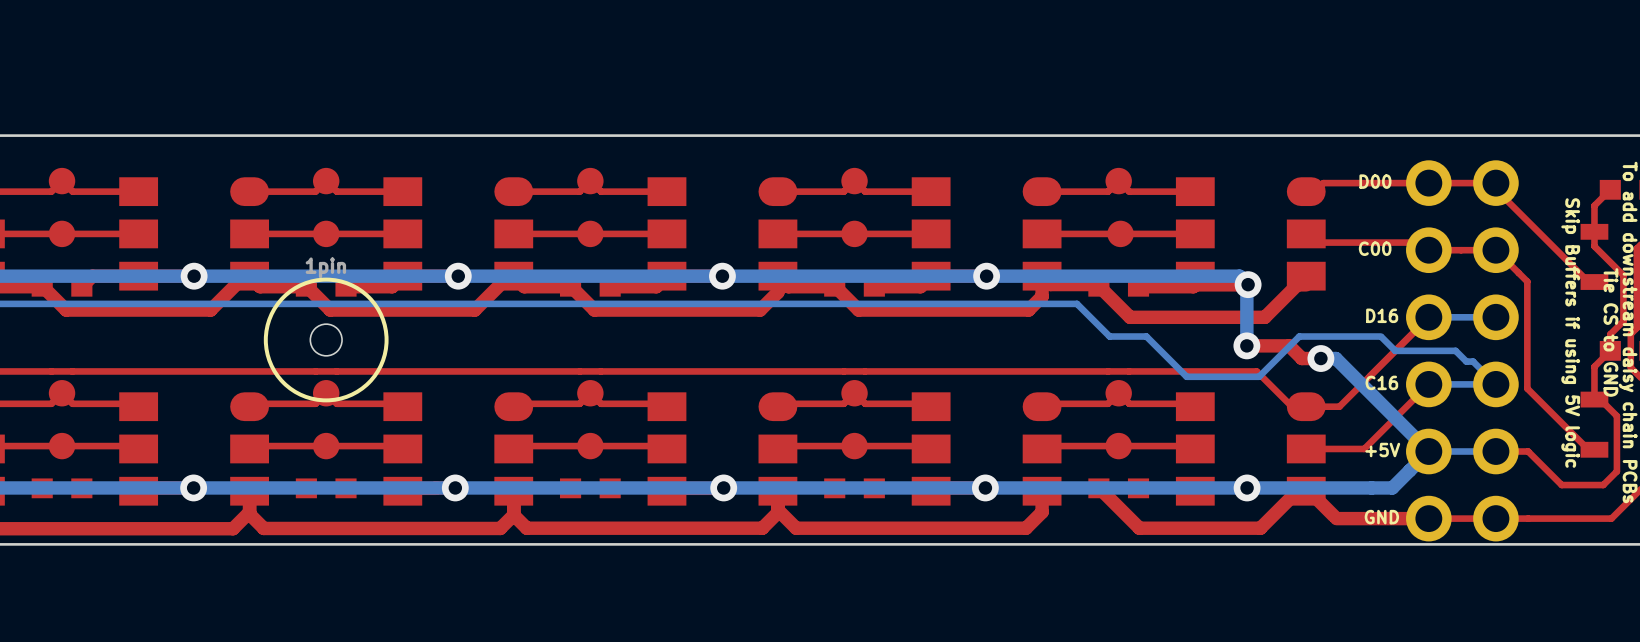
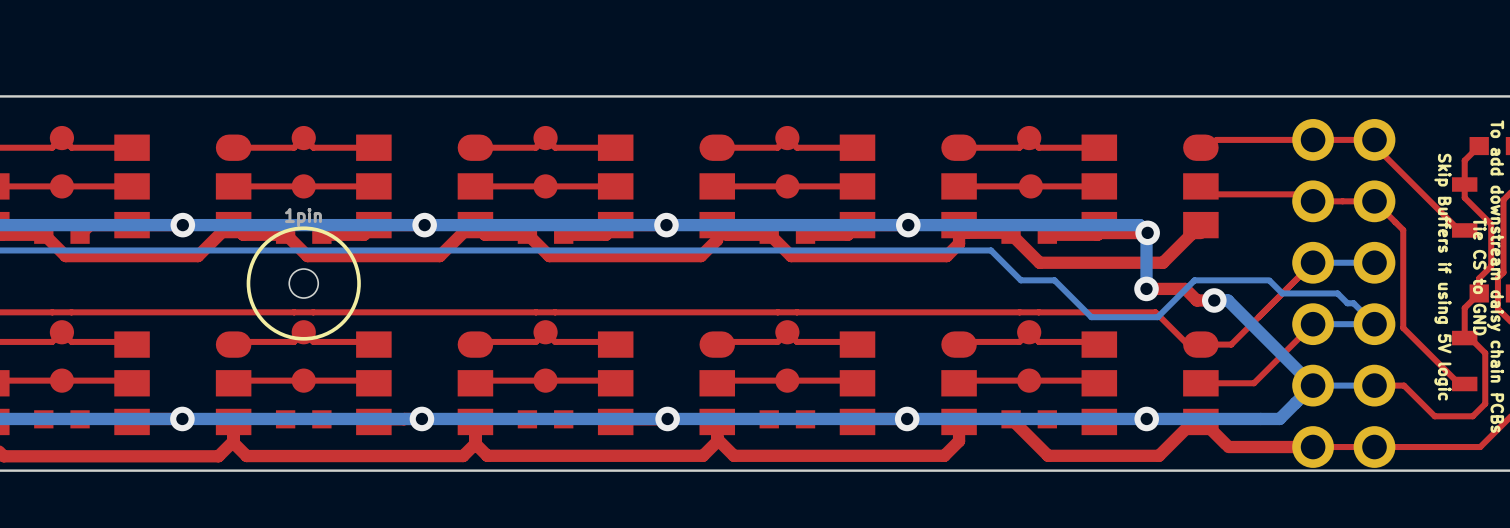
text: D00 (1375, 181) -> none
text: C00 (1375, 248) -> none
text: D16 (1382, 315) -> none
text: C16 (1381, 382) -> none
text: +5V (1382, 450) -> none
text: GND (1381, 517) -> none

